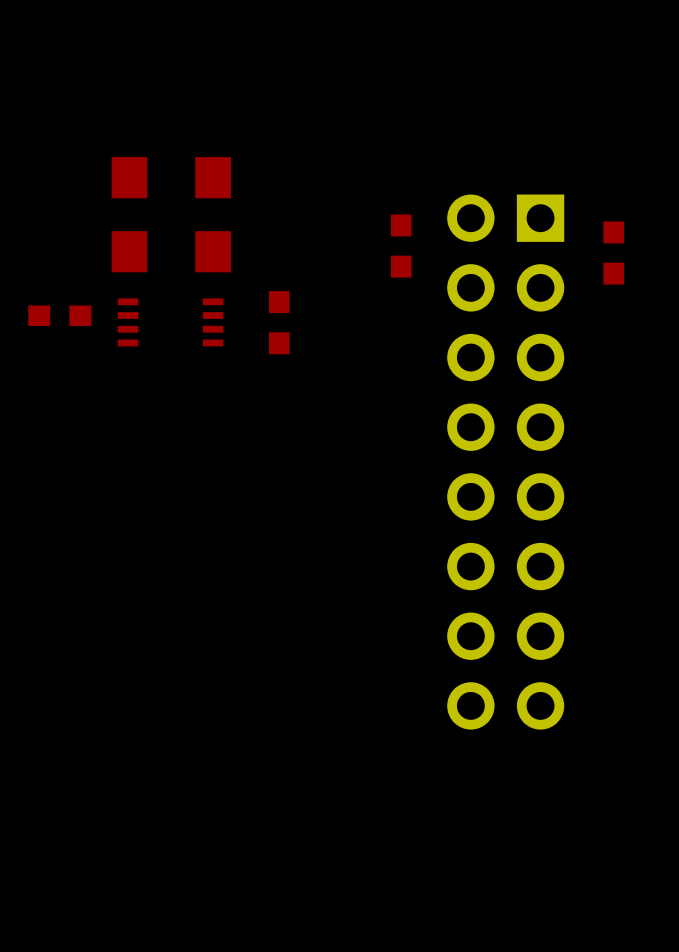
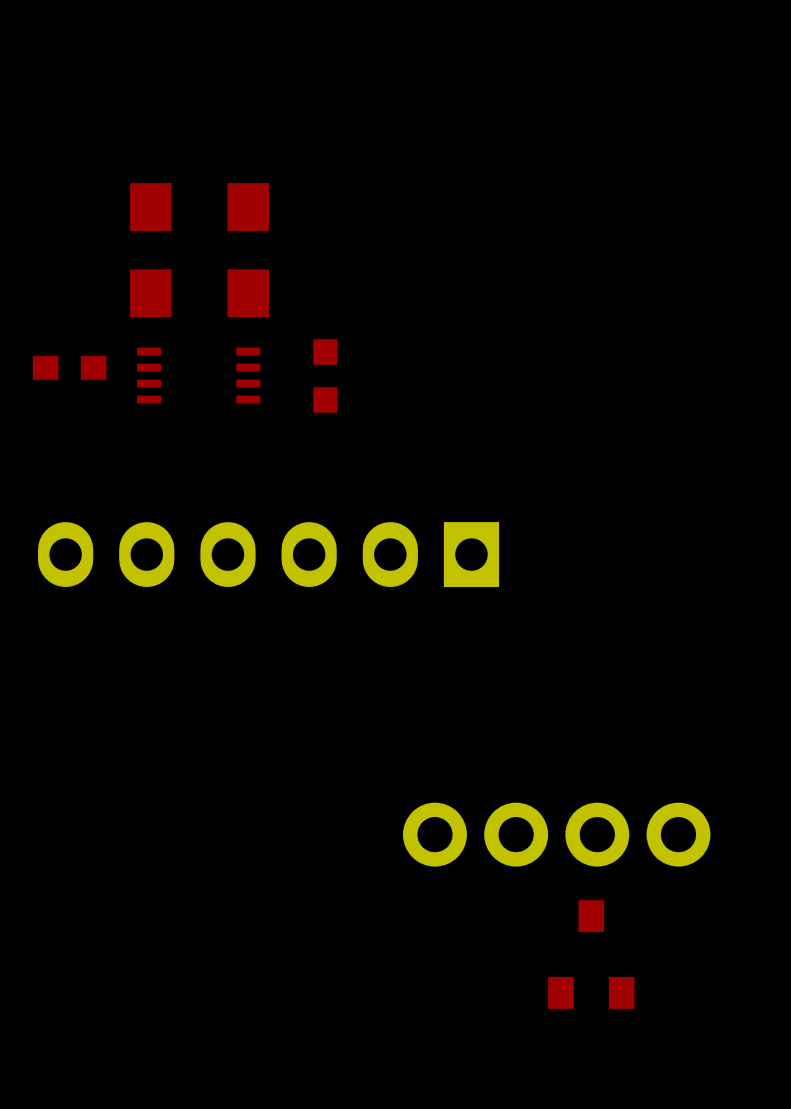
part: (401, 246) -> none
part: (613, 253) -> none
part: (505, 462) -> none
part: none -> (268, 554)
part: none -> (556, 834)
part: none -> (591, 954)

